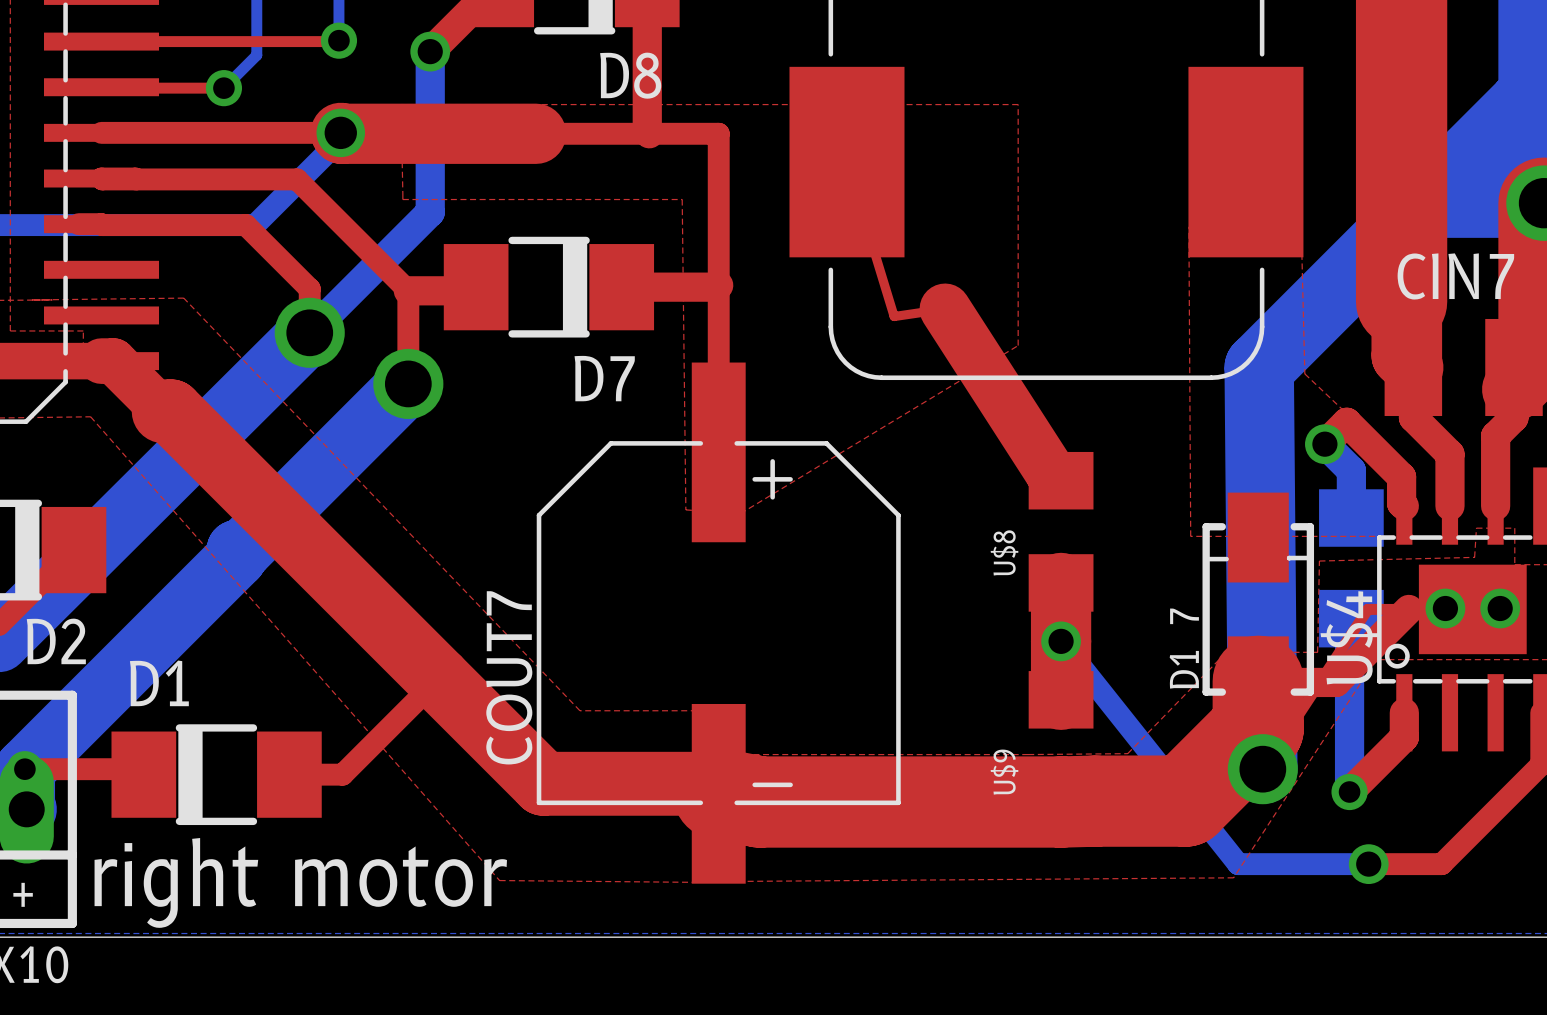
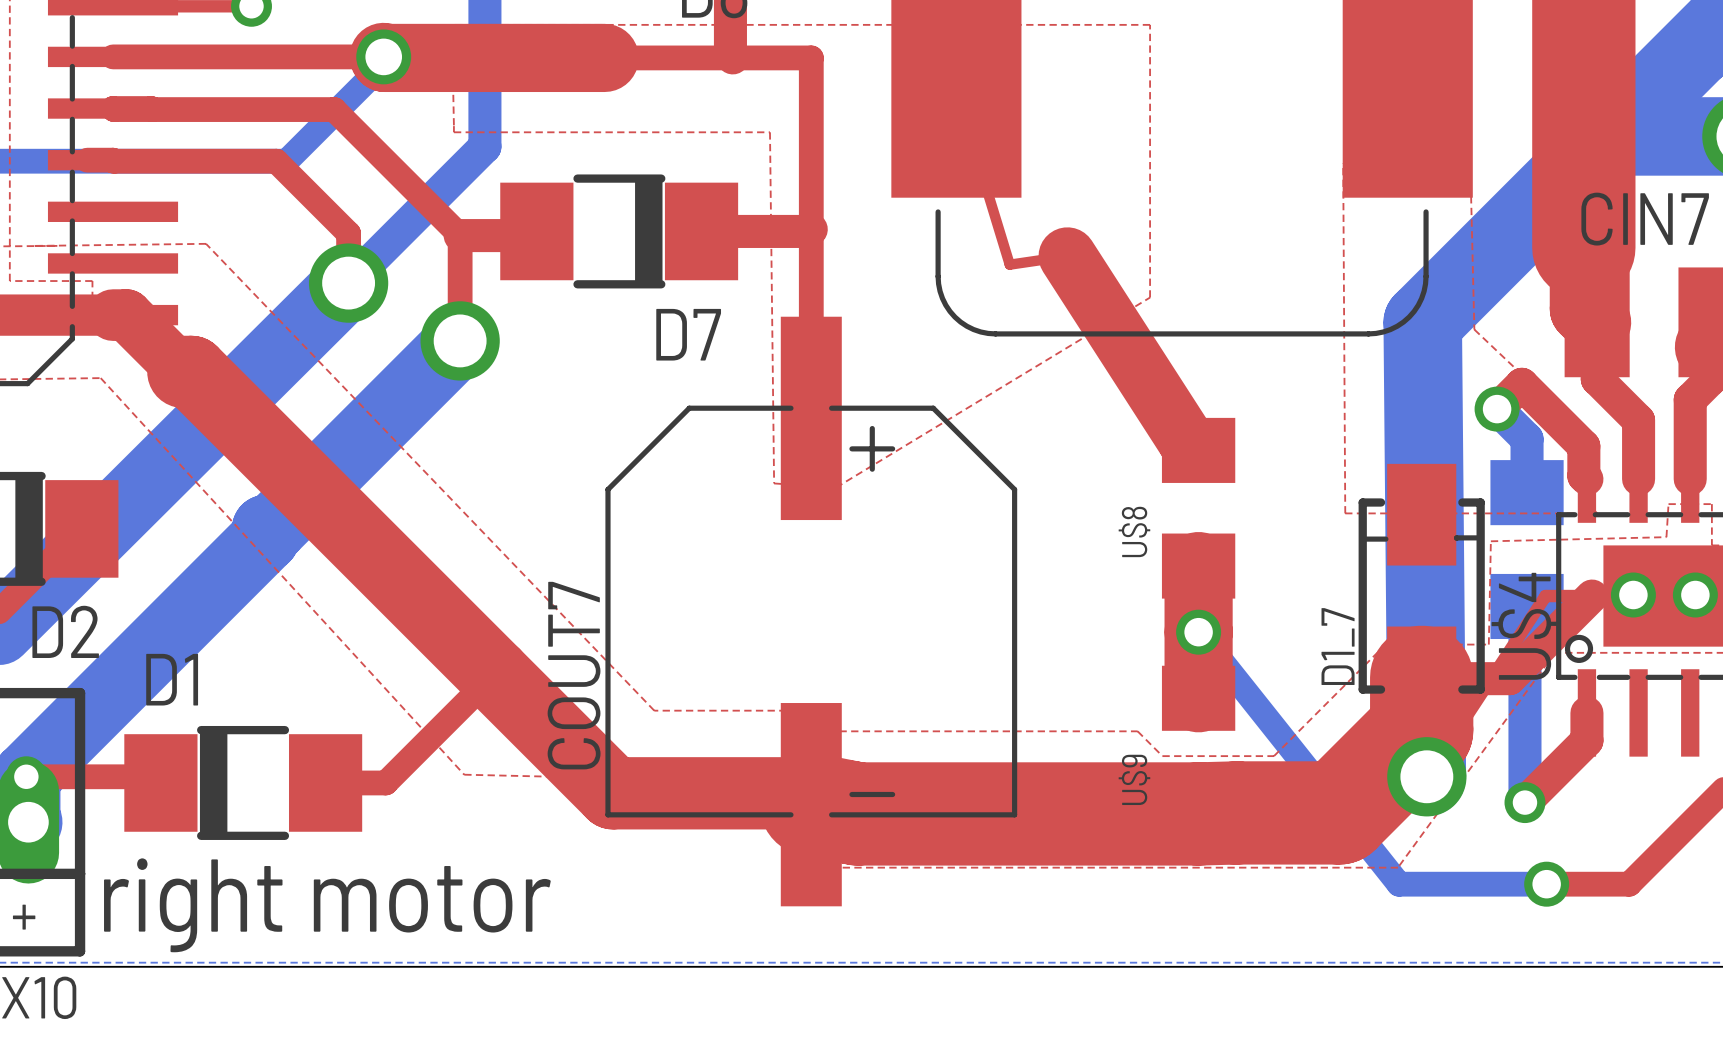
top zone outline: (90, 416) (499, 880) (699, 882) (696, 710) -> (100, 378) (464, 774) (555, 776) (604, 826) (786, 826) (786, 710)
top zone outline: (1226, 652) (1127, 753) (734, 754) (730, 881) (1233, 877) (1376, 659) -> (1385, 644) (1274, 756) (1162, 756) (1137, 731) (827, 731) (827, 867) (1397, 867) (1554, 652)

